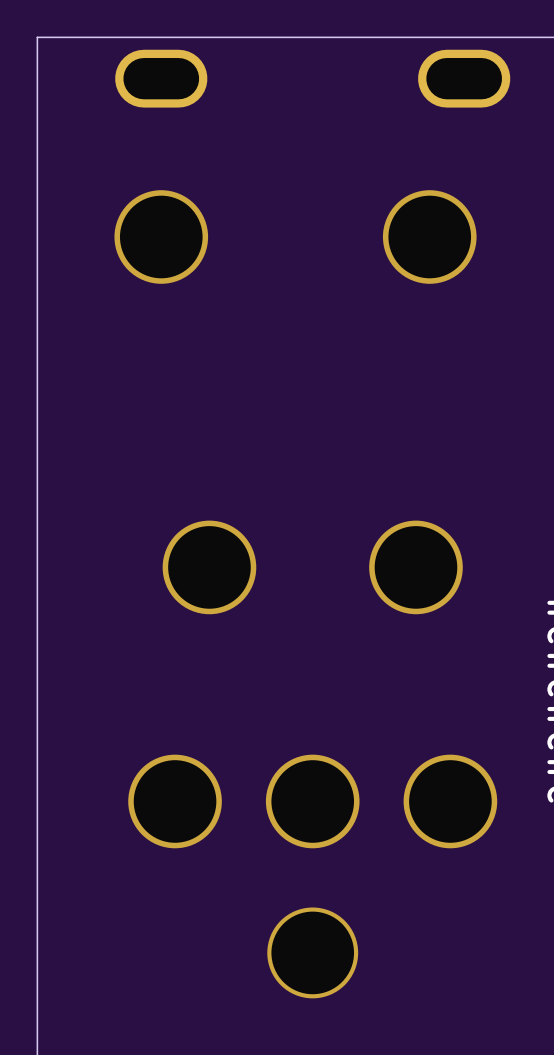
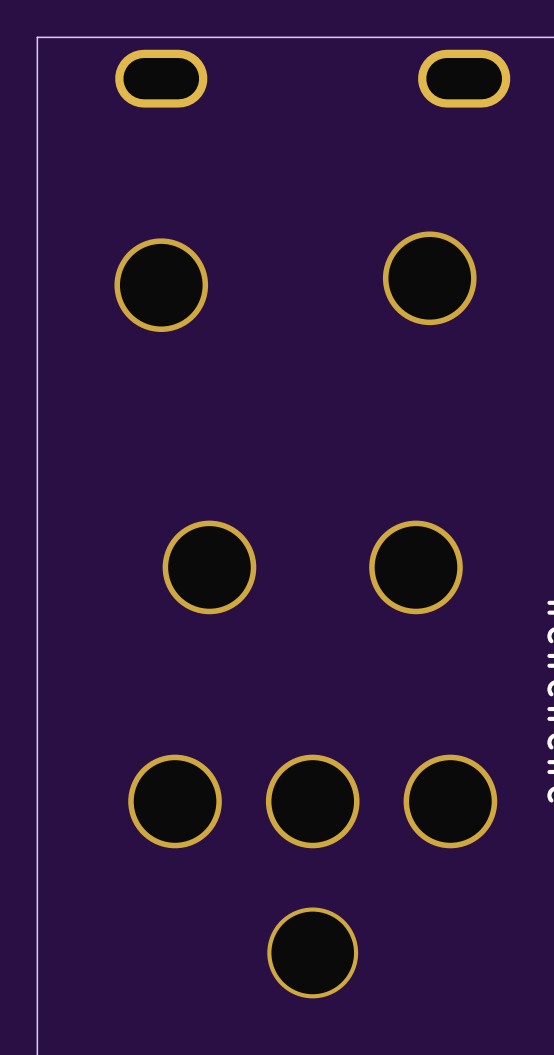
via position: (161, 236) -> (161, 285)
via position: (429, 236) -> (429, 278)

